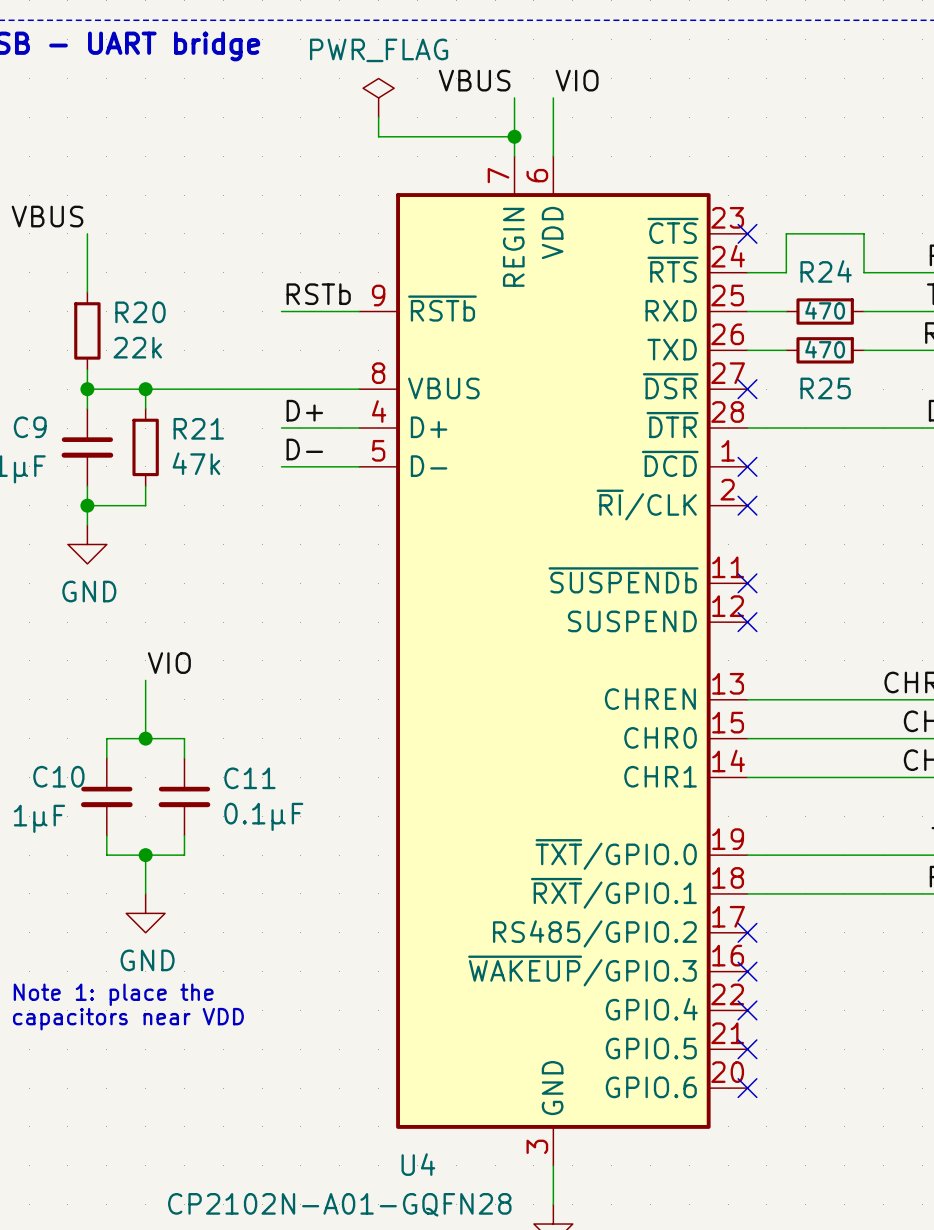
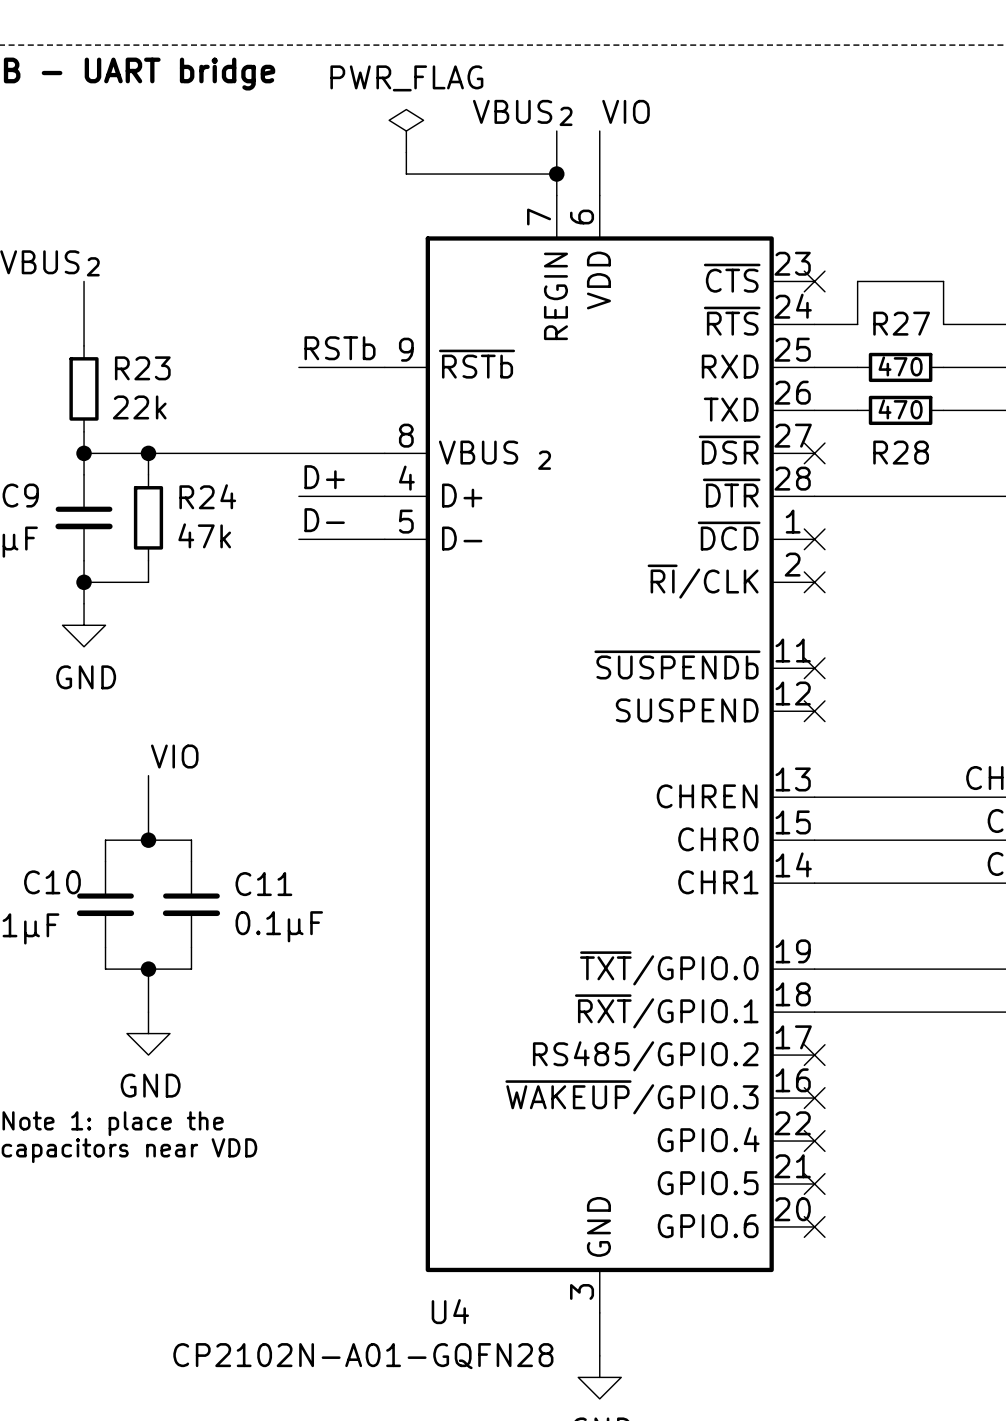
text: none -> 2 (566, 116)
text: none -> 2 (93, 266)
R24 name: R24 (826, 271) -> R27 (901, 323)
R20 name: R20 (140, 312) -> R23 (142, 368)
R25 name: R25 (825, 388) -> R28 (901, 452)
text: none -> 2 (544, 460)
R21 name: R21 (198, 428) -> R24 (207, 496)

